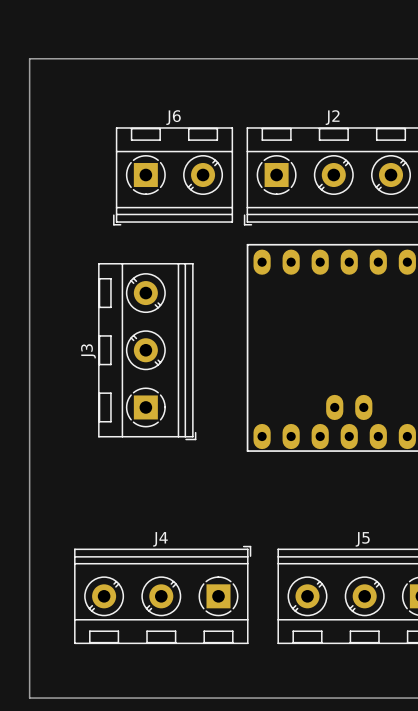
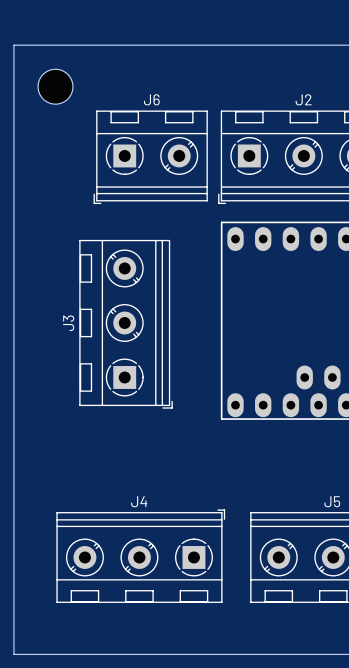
part: none -> (55, 86)

